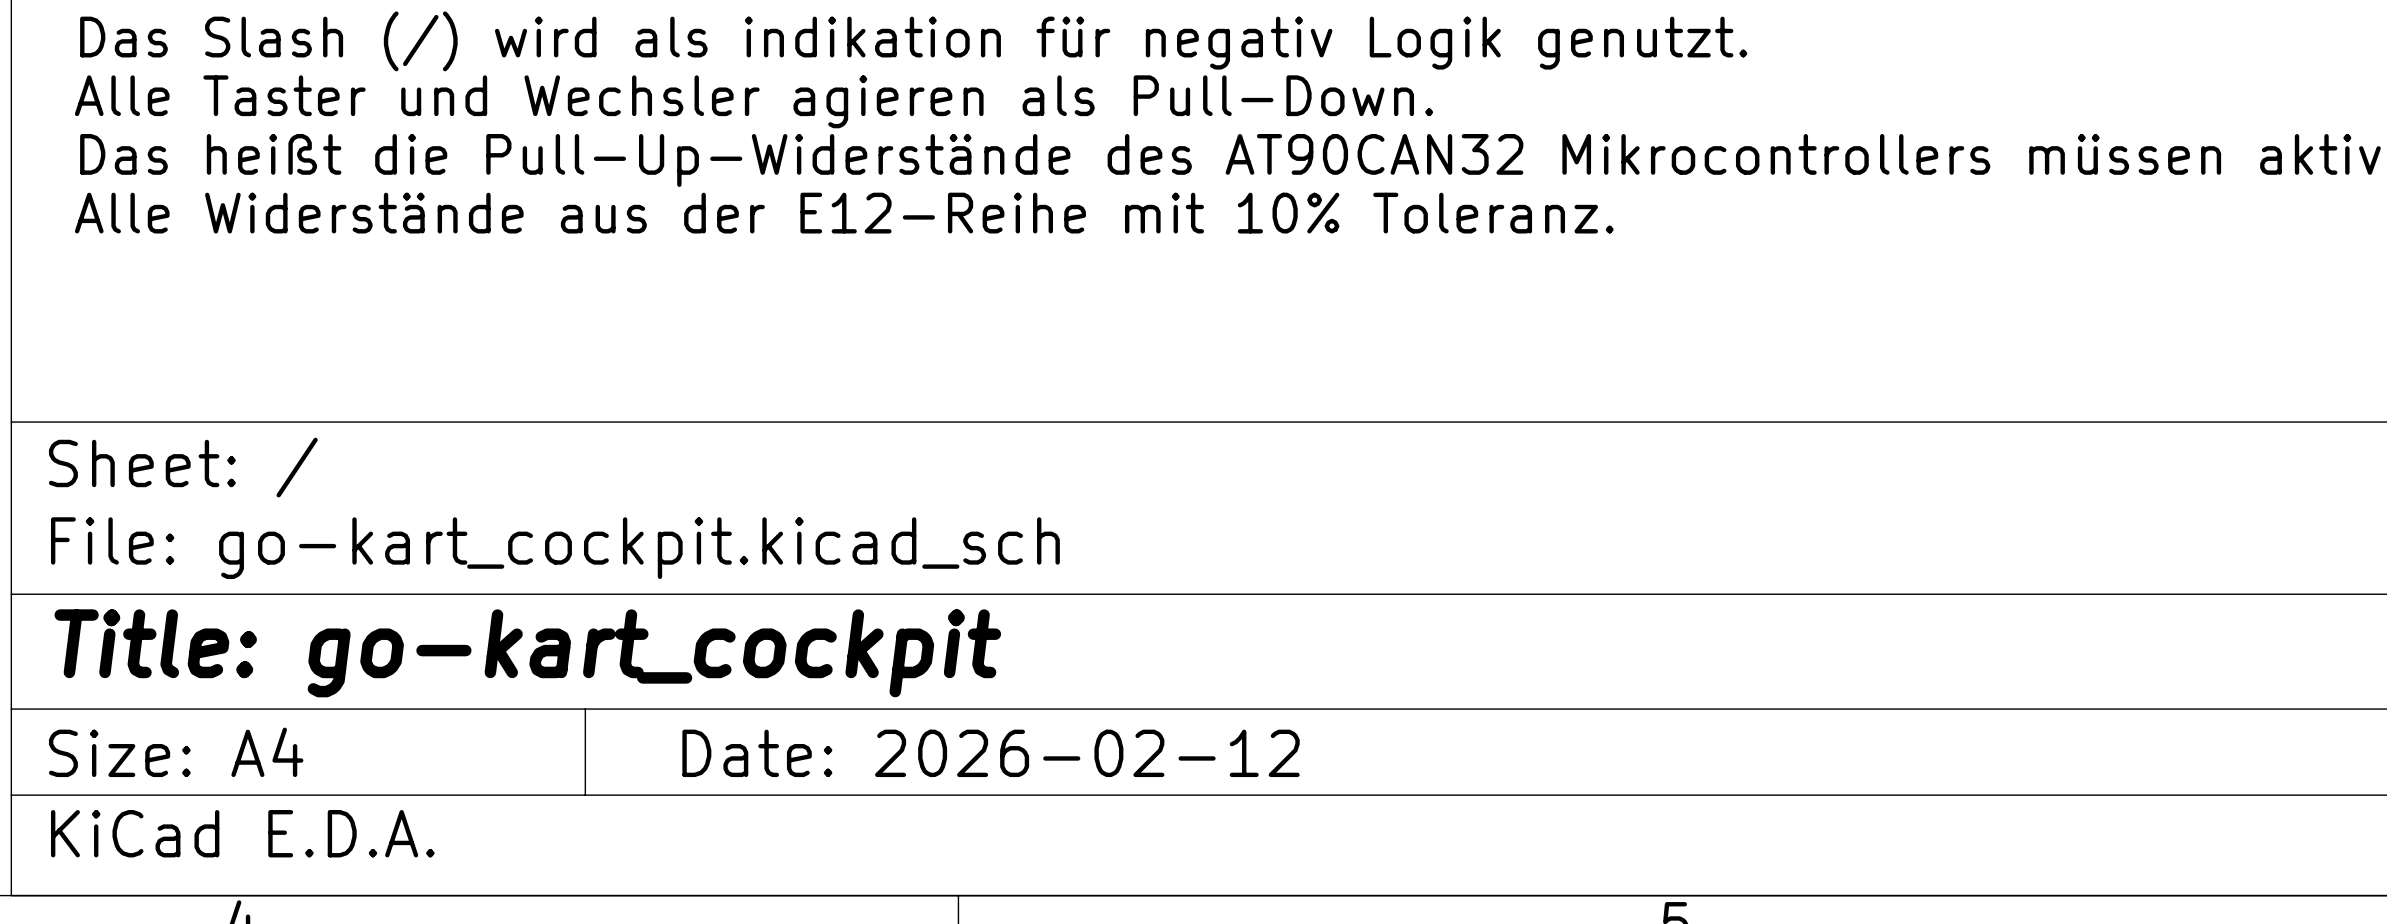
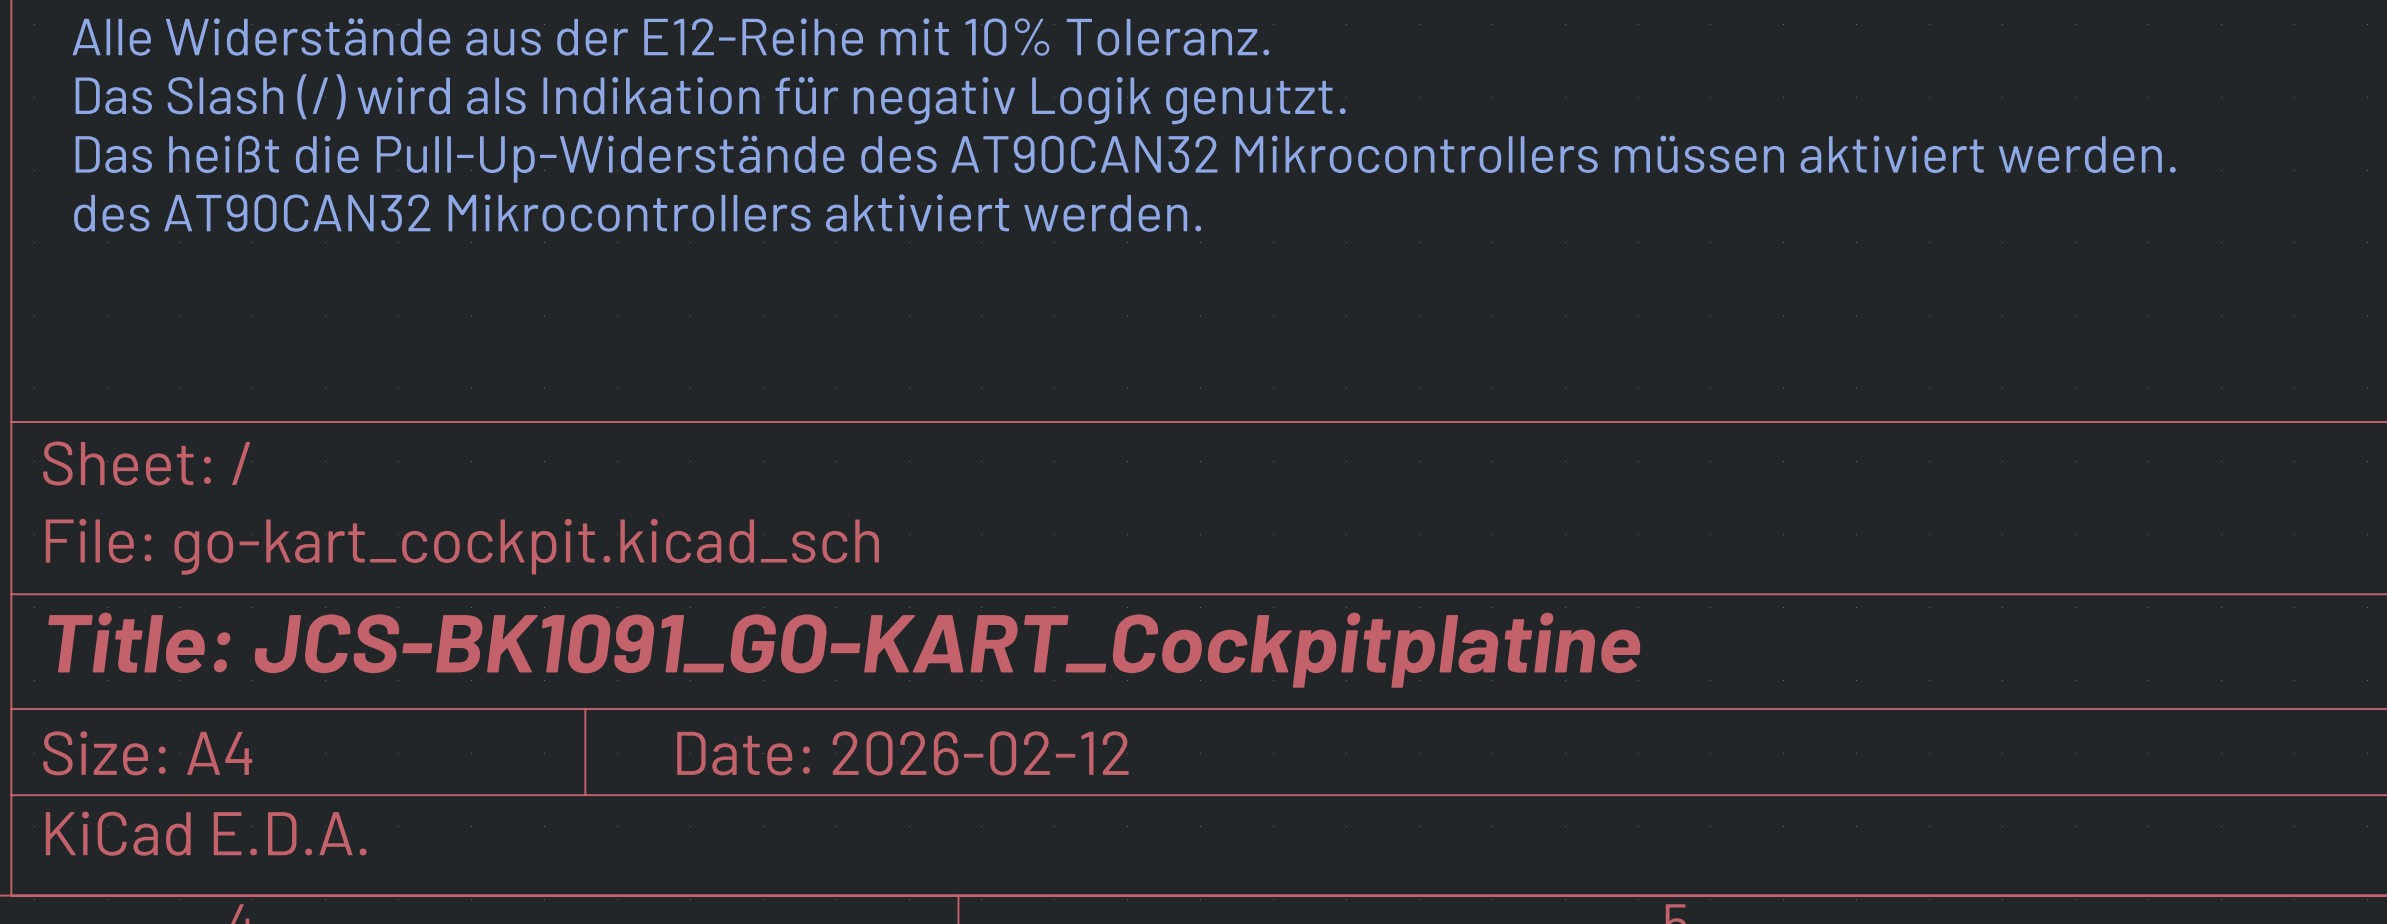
text: Das Slash (/) wird als indikation für negativ Logik genutzt. (913, 41) -> Alle Widerstände aus der E12-Reihe mit 10% Toleranz. (670, 37)
text: Alle Taster und Wechsler agieren als Pull-Down. (754, 101) -> Das Slash (/) wird als Indikation für negativ Logik genutzt. (710, 99)
text: Alle Widerstände aus der E12-Reihe mit 10% Toleranz. (844, 213) -> des AT90CAN32 Mikrocontrollers aktiviert werden. (637, 213)
title block: Title: go-kart_cockpit (527, 653) -> Title: JCS-BK1091_GO-KART_Cockpitplatine (844, 650)

